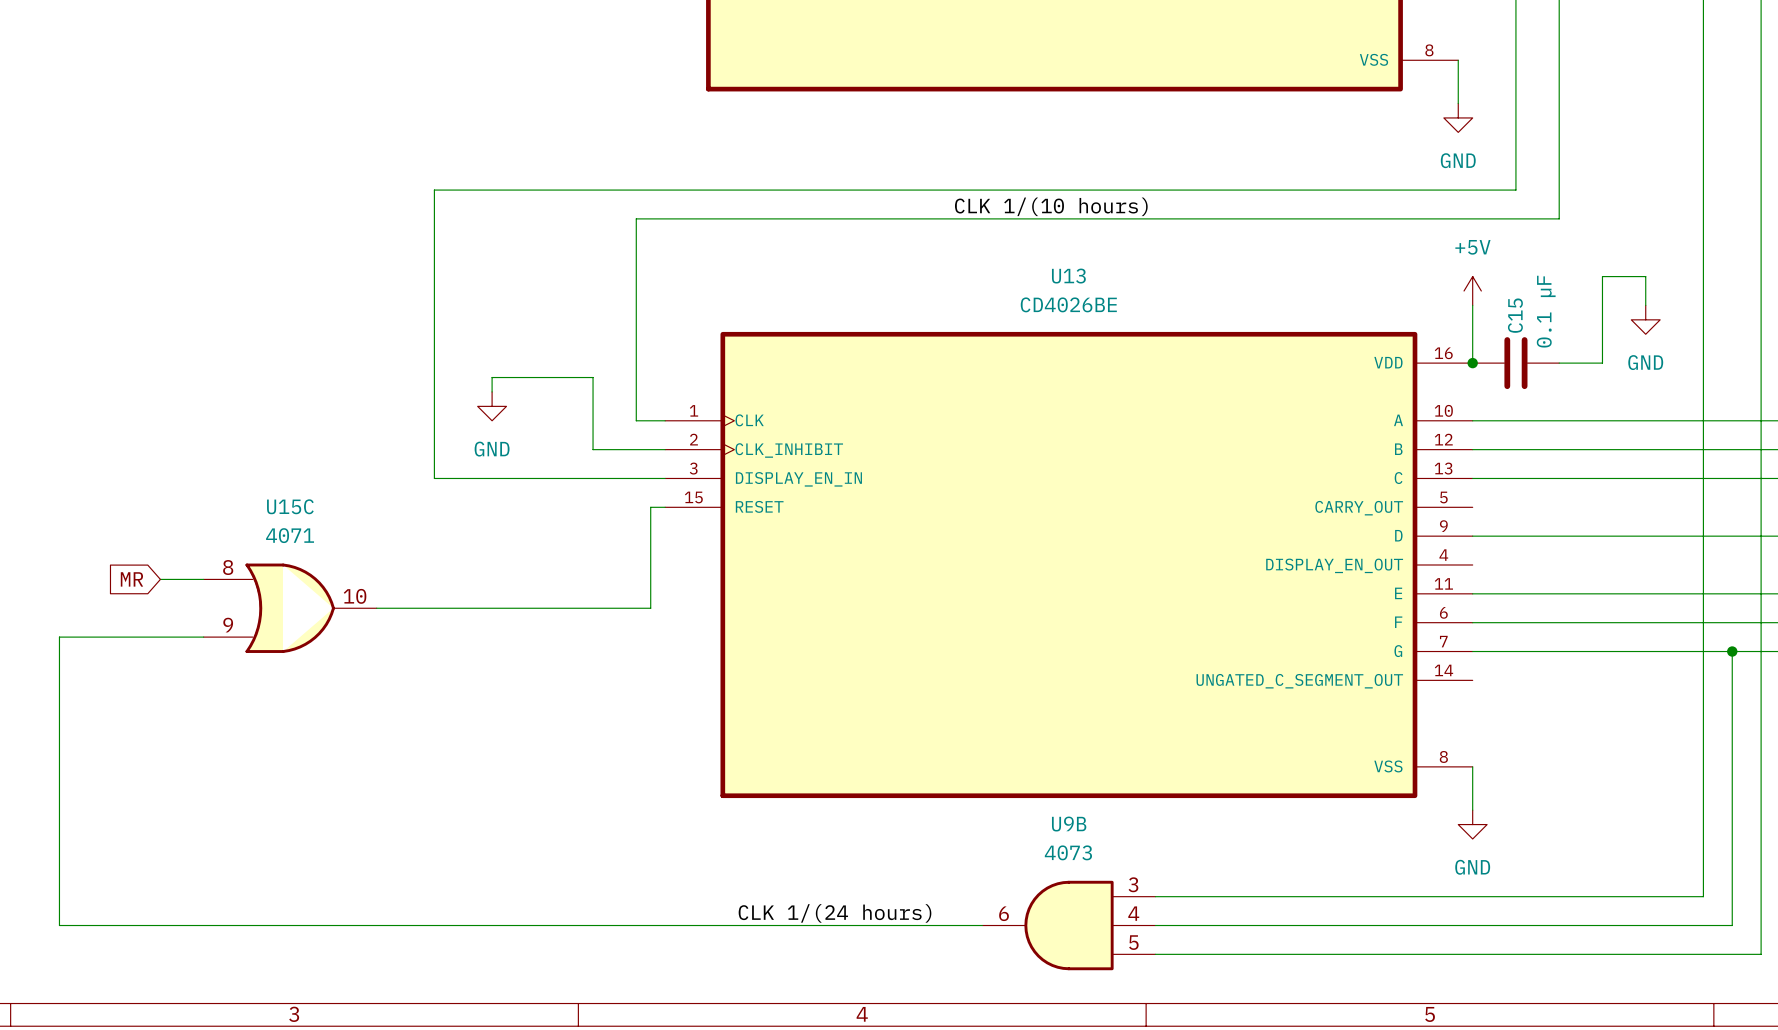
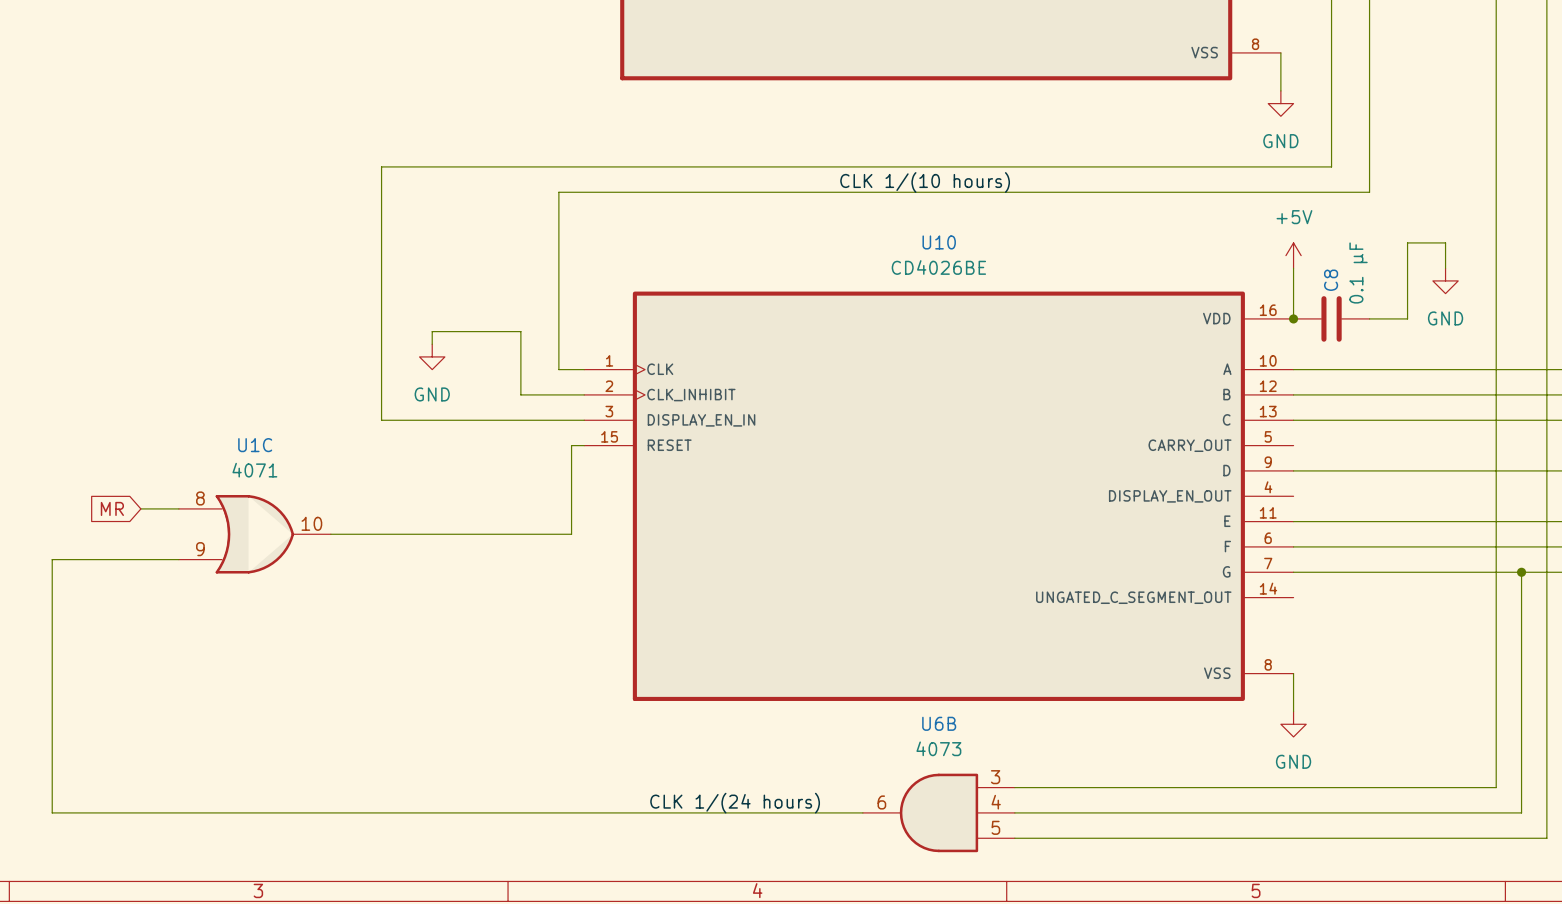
U13 name: U13 (1068, 276) -> U10 (939, 242)
C15 name: C15 (1515, 315) -> C8 (1331, 280)
U15C name: U15C (290, 506) -> U1C (255, 445)
U9B name: U9B (1069, 824) -> U6B (939, 723)

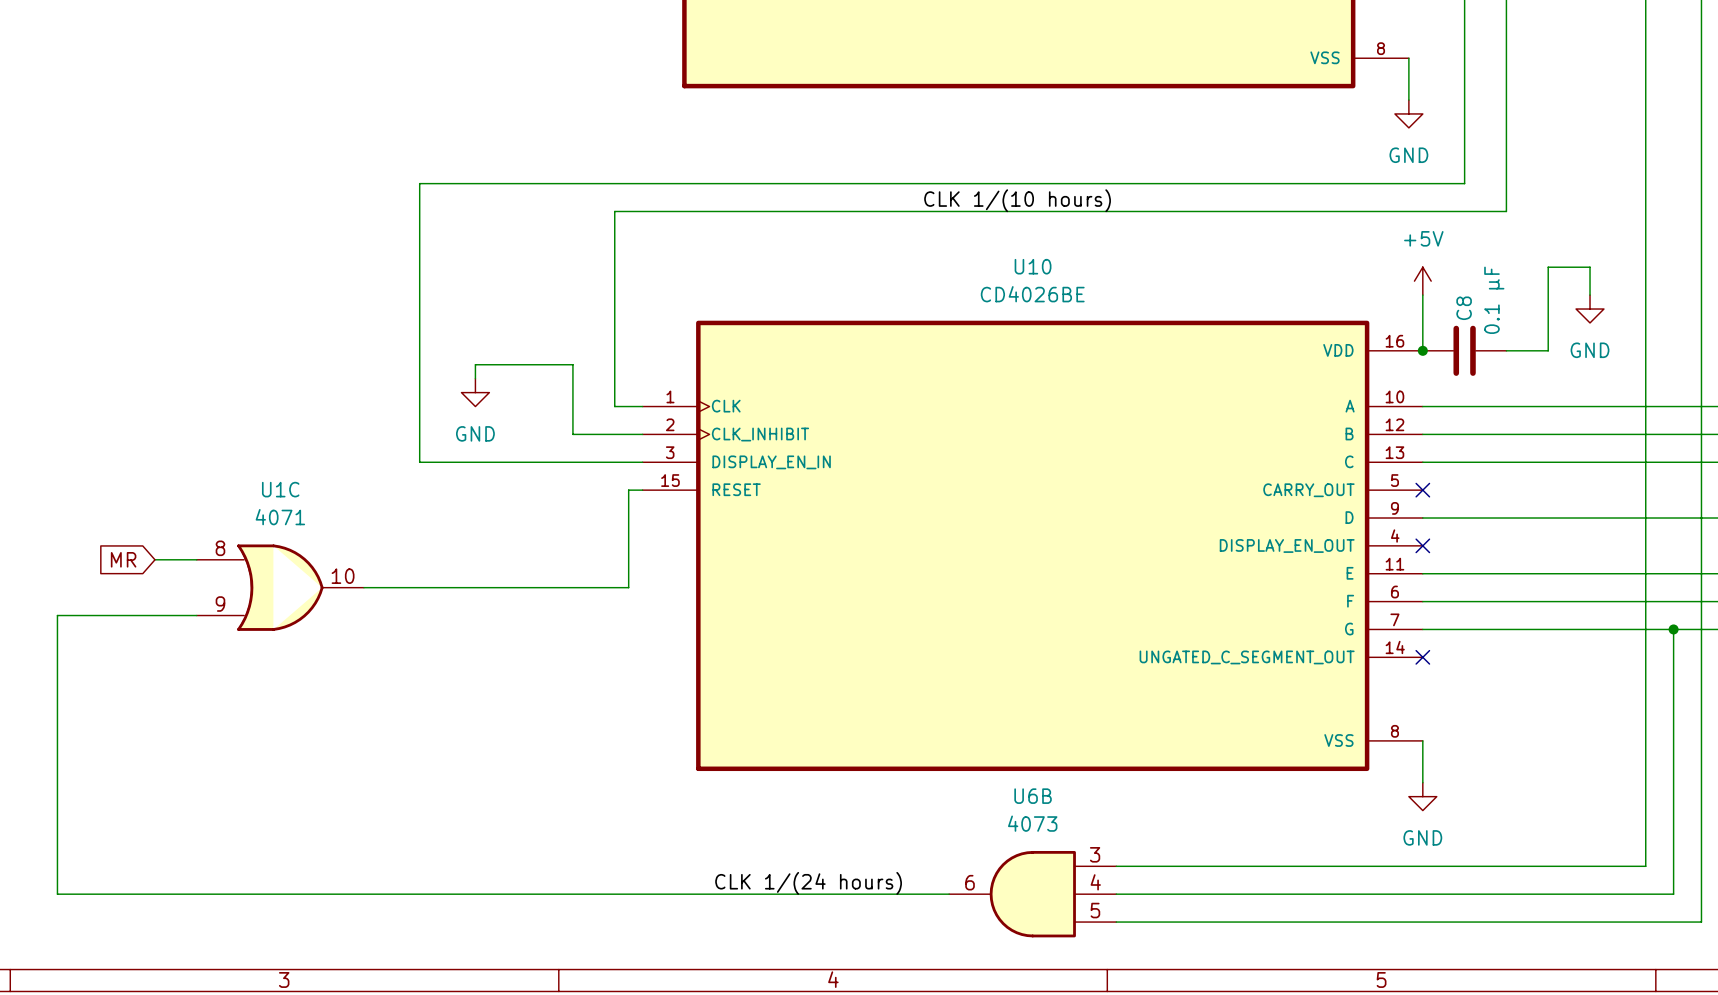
no-connect mark: none -> (1422, 490)
no-connect mark: none -> (1422, 545)
no-connect mark: none -> (1422, 657)

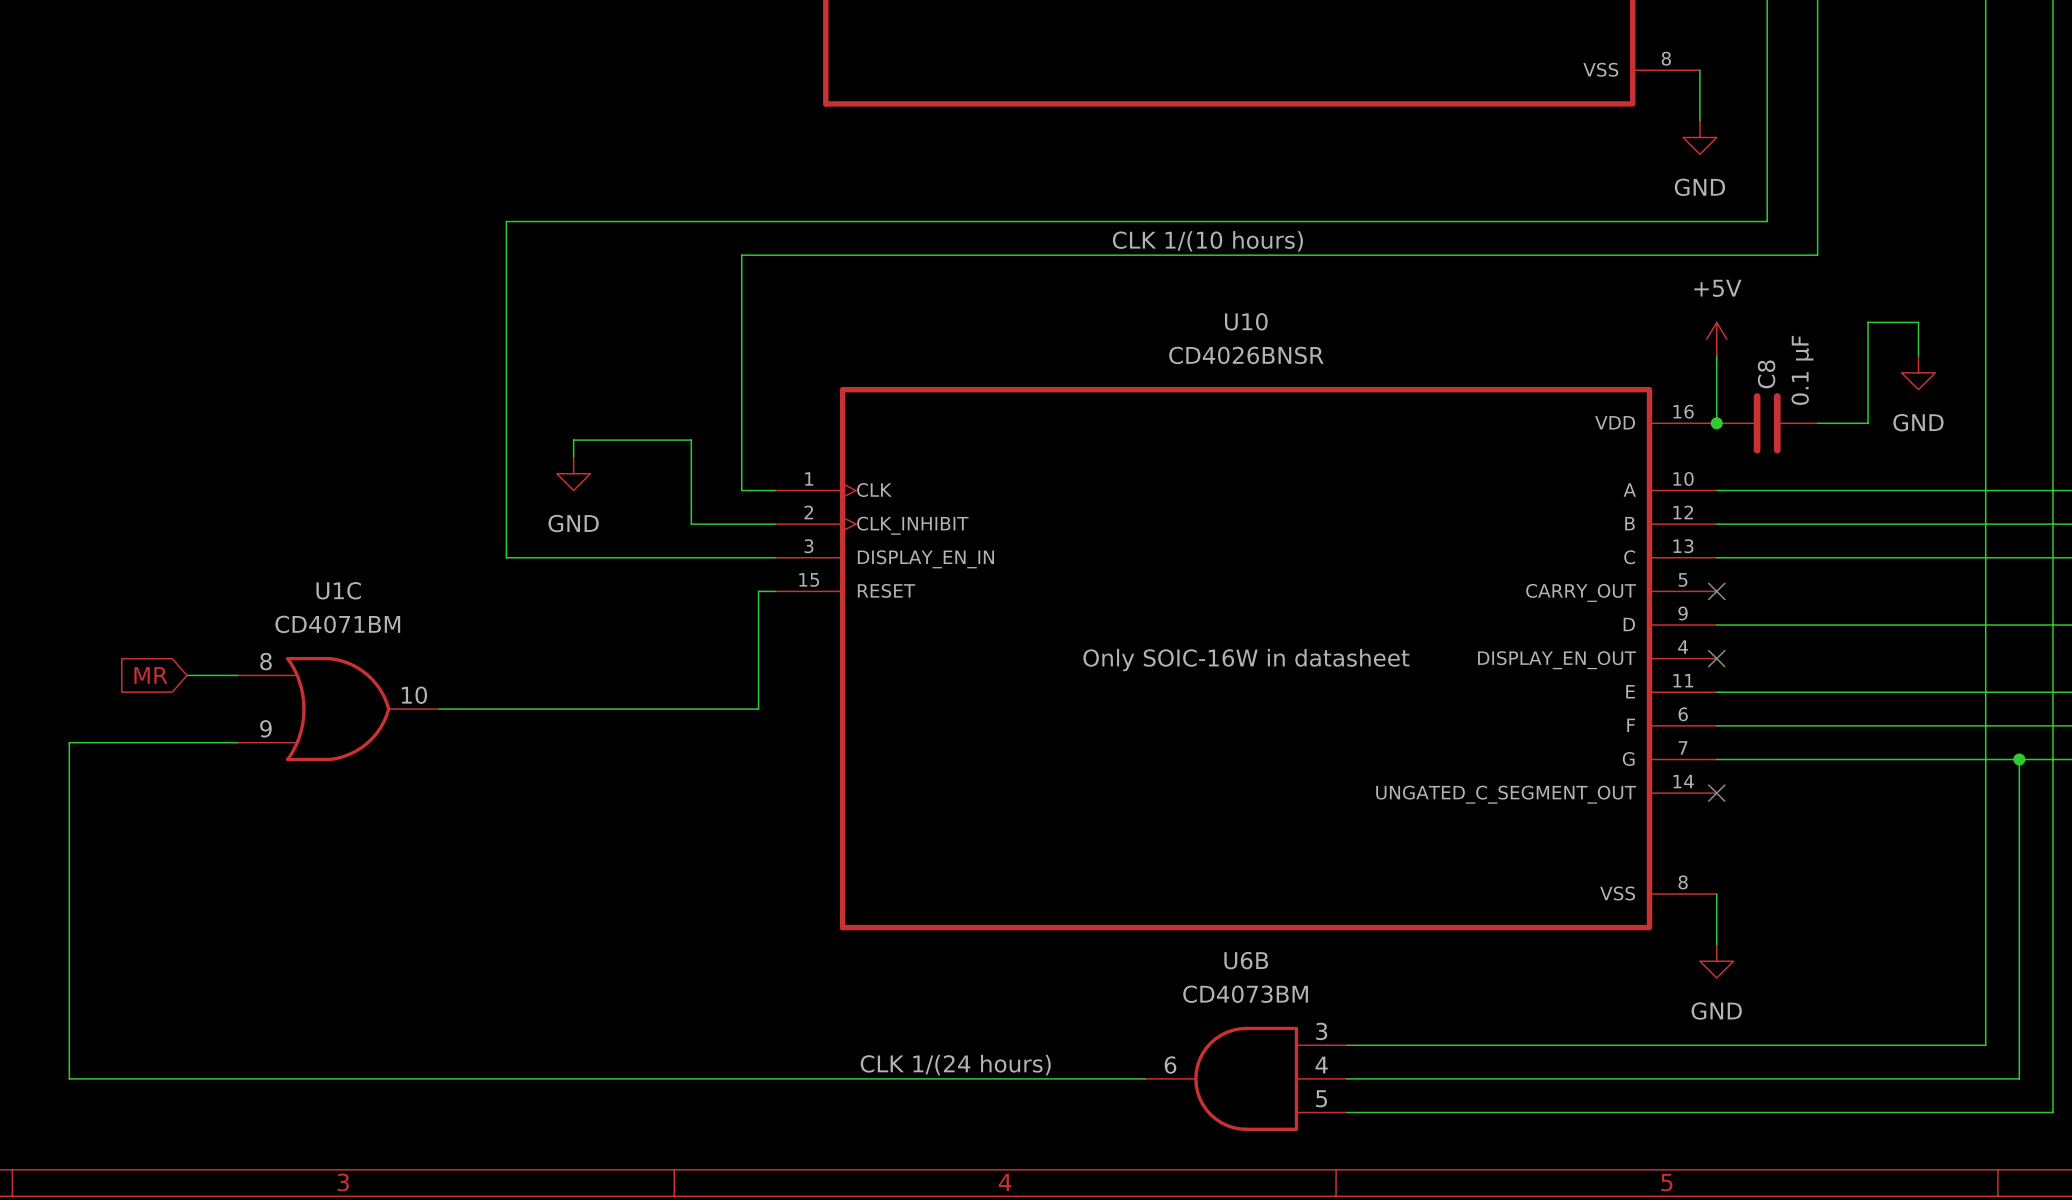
U10 value: CD4026BE (1032, 294) -> CD4026BNSR (1246, 355)
U1C value: 4071 (280, 517) -> CD4071BM (337, 624)
U10 text: none -> Only SOIC-16W in datasheet (1246, 660)
U6B value: 4073 (1032, 823) -> CD4073BM (1245, 994)

